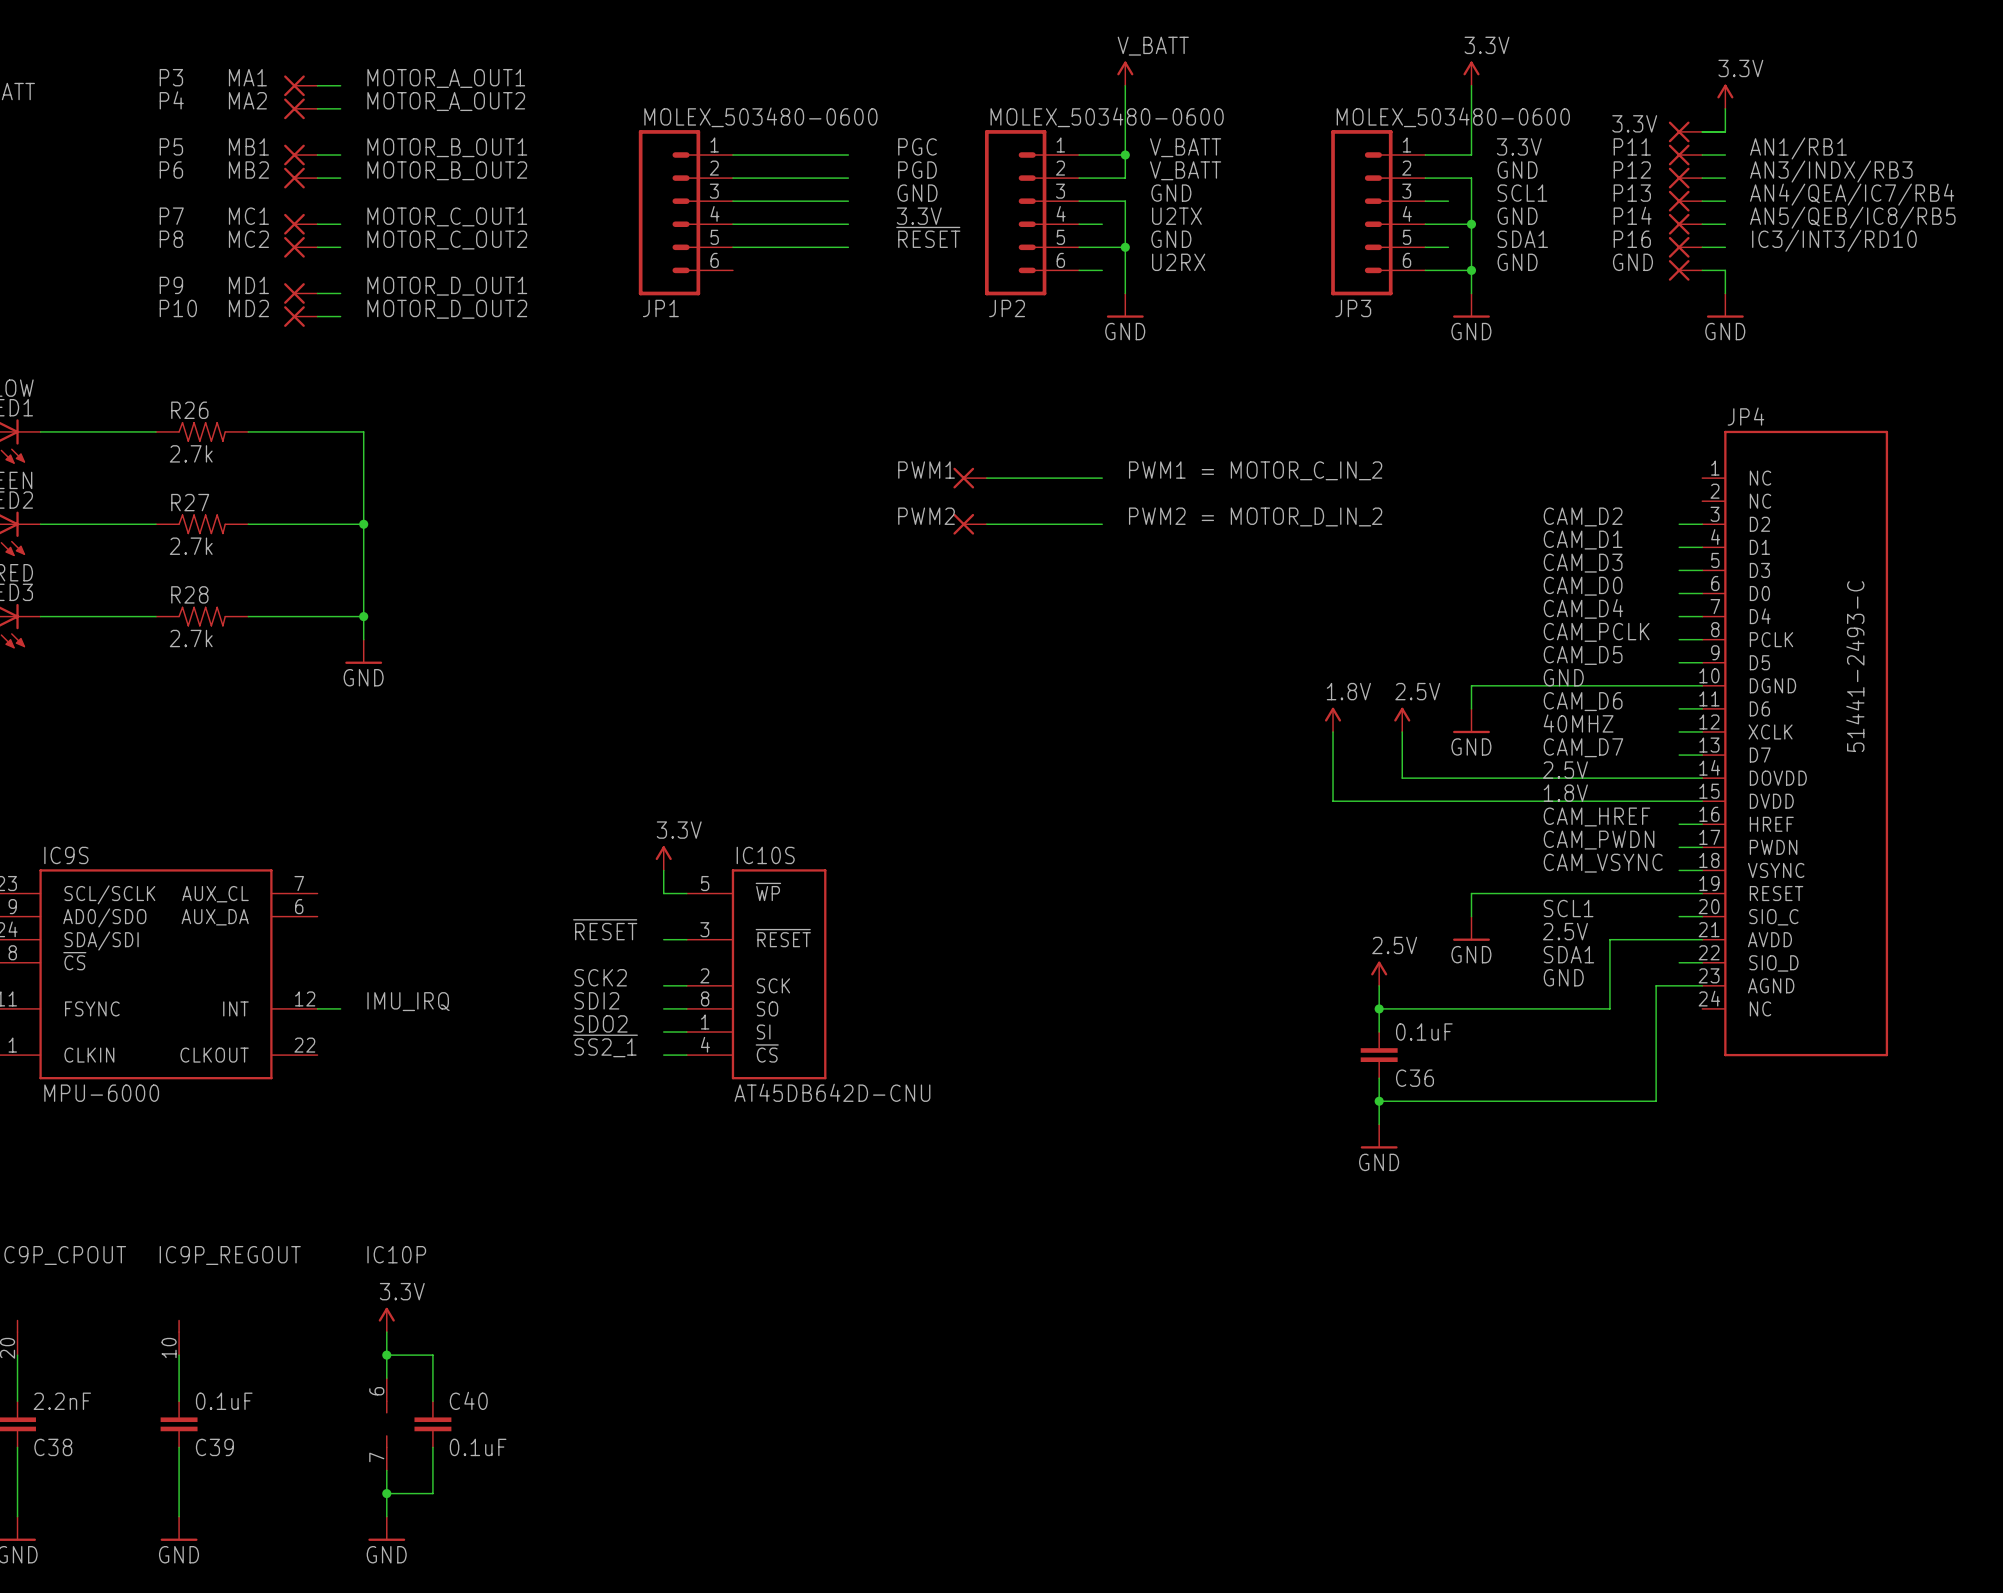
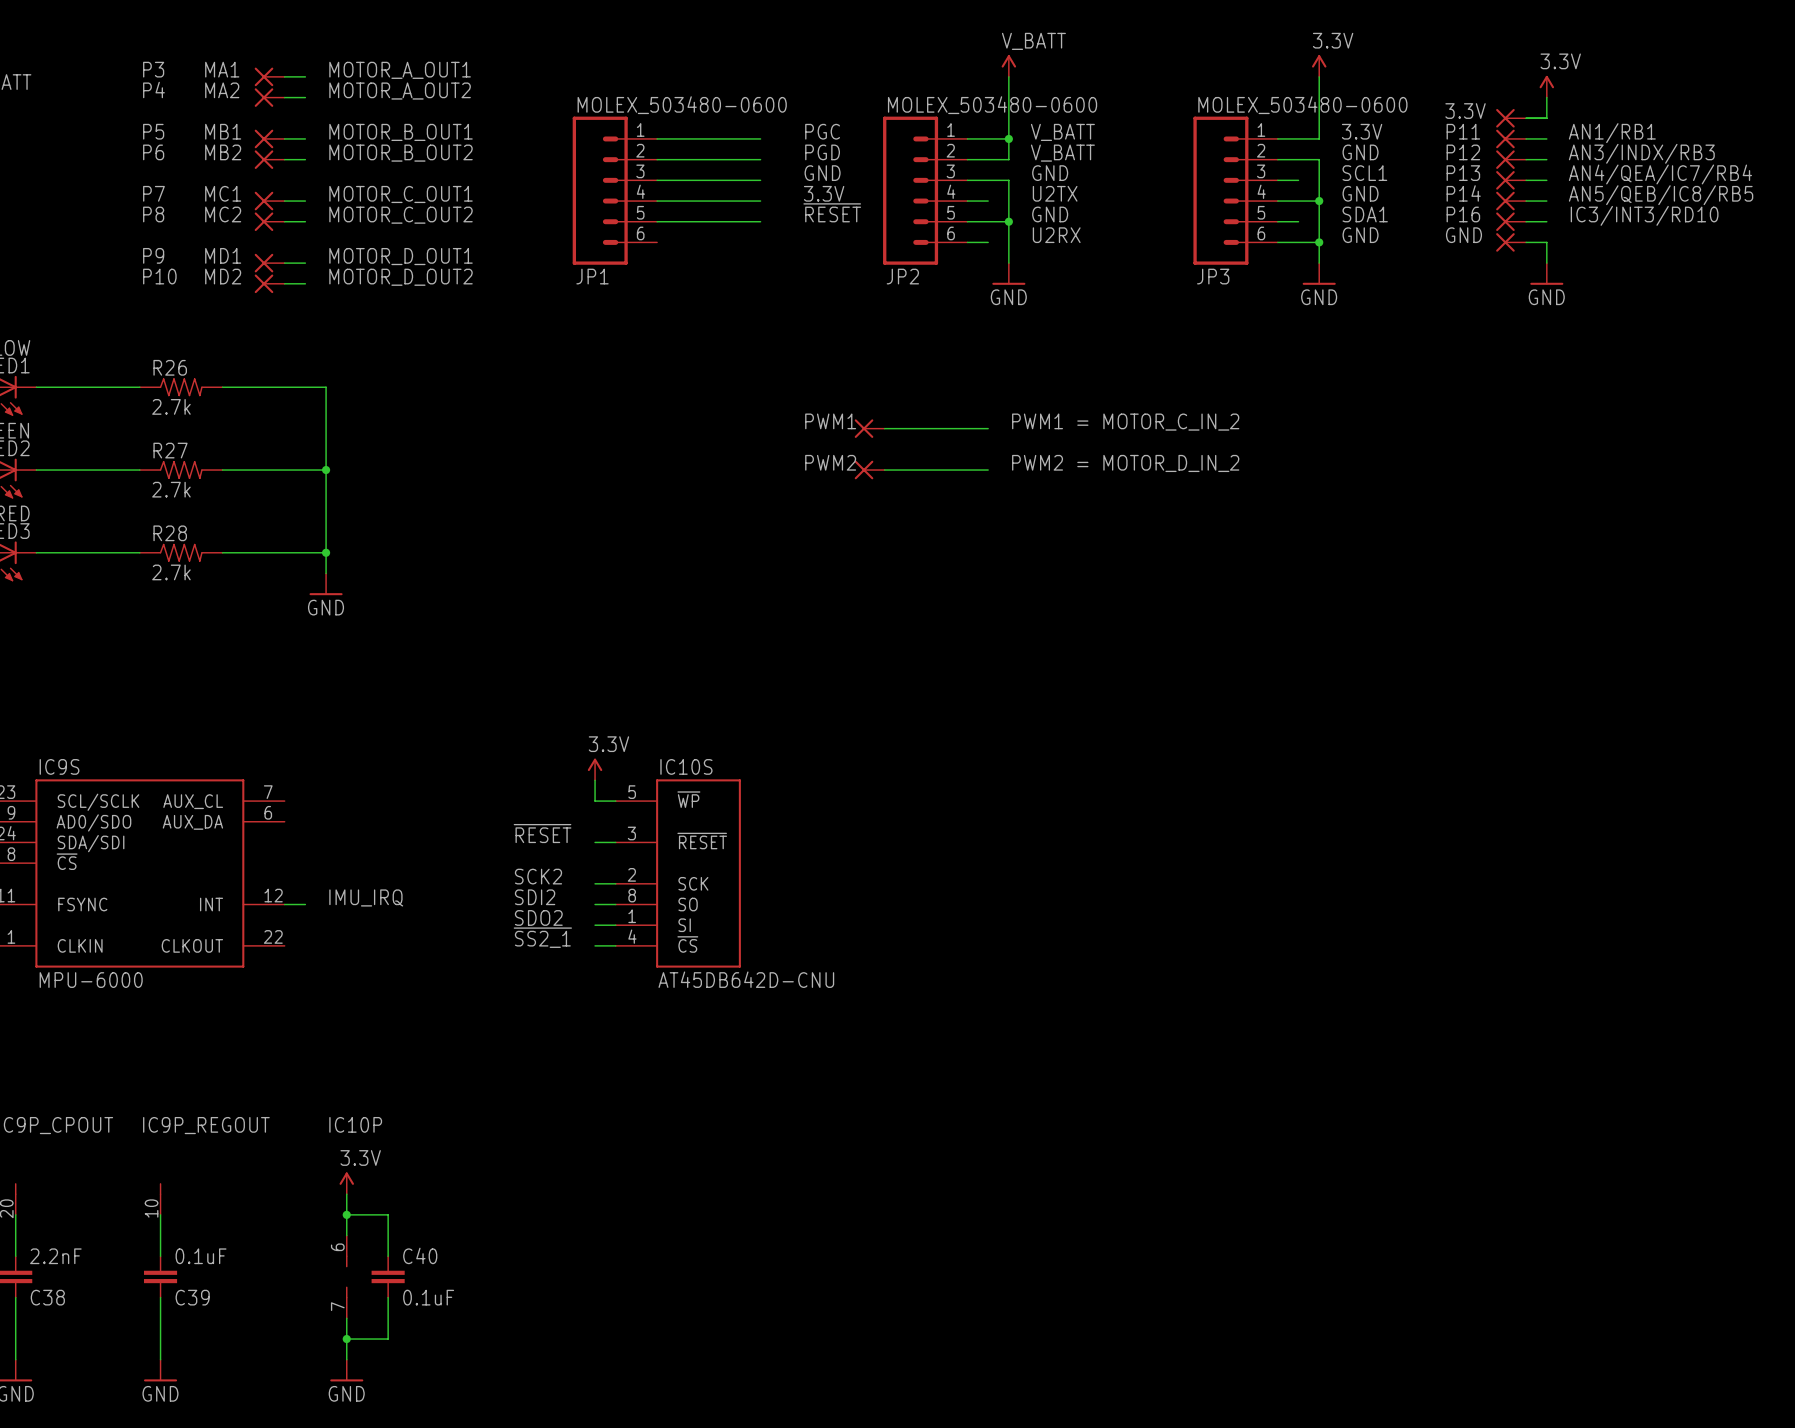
label: CAM_D2 (1583, 516) -> none
wire: (1679, 524) (1702, 524) -> none
label: CAM_D1 (1583, 540) -> none
wire: (1679, 547) (1702, 547) -> none
label: CAM_D3 (1583, 563) -> none
wire: (1679, 570) (1702, 570) -> none
label: CAM_D0 (1583, 586) -> none
wire: (1679, 593) (1702, 593) -> none
label: CAM_D4 (1583, 608) -> none
wire: (1679, 616) (1702, 616) -> none
label: CAM_PCLK (1596, 632) -> none
wire: (1679, 639) (1702, 639) -> none
label: CAM_D5 (1583, 655) -> none
wire: (1679, 662) (1702, 662) -> none
label: GND (1563, 677) -> none
wire: (1702, 685) (1471, 685) (1471, 708) -> none
label: CAM_D6 (1583, 701) -> none
wire: (1679, 708) (1702, 708) -> none
power symbol: 1.8V (1333, 719) -> none
power symbol: 2.5V (1402, 719) -> none
power symbol: GND (1471, 721) -> none
label: 40MHZ (1578, 723) -> none
wire: (1333, 731) (1333, 801) (1702, 801) -> none
wire: (1402, 731) (1402, 778) (1702, 778) -> none
wire: (1679, 731) (1702, 731) -> none
JP4: 51441-2493-C (1795, 743) -> none
label: CAM_D7 (1583, 747) -> none
wire: (1679, 755) (1702, 755) -> none
label: 2.5V (1565, 770) -> none
label: 1.8V (1565, 793) -> none
label: CAM_HREF (1596, 816) -> none
wire: (1679, 824) (1702, 824) -> none
label: CAM_PWDN (1599, 840) -> none
wire: (1679, 847) (1702, 847) -> none
label: CAM_VSYNC (1603, 863) -> none
wire: (1679, 870) (1702, 870) -> none
wire: (1702, 893) (1471, 893) (1471, 916) -> none
label: SCL1 (1568, 908) -> none
wire: (1679, 916) (1702, 916) -> none
power symbol: GND (1471, 928) -> none
label: 2.5V (1565, 931) -> none
wire: (1702, 939) (1609, 939) (1609, 1008) (1379, 1008) -> none
label: SDA1 (1568, 954) -> none
wire: (1679, 962) (1702, 962) -> none
power symbol: 2.5V (1379, 973) -> none
label: GND (1563, 977) -> none
wire: (1379, 985) (1379, 1032) -> none
wire: (1702, 985) (1656, 985) (1656, 1101) (1379, 1101) -> none
junction: (1379, 1008) -> none
C36: 0.1uF (1379, 1055) -> none
wire: (1379, 1078) (1379, 1124) -> none
junction: (1379, 1101) -> none
power symbol: GND (1379, 1136) -> none

